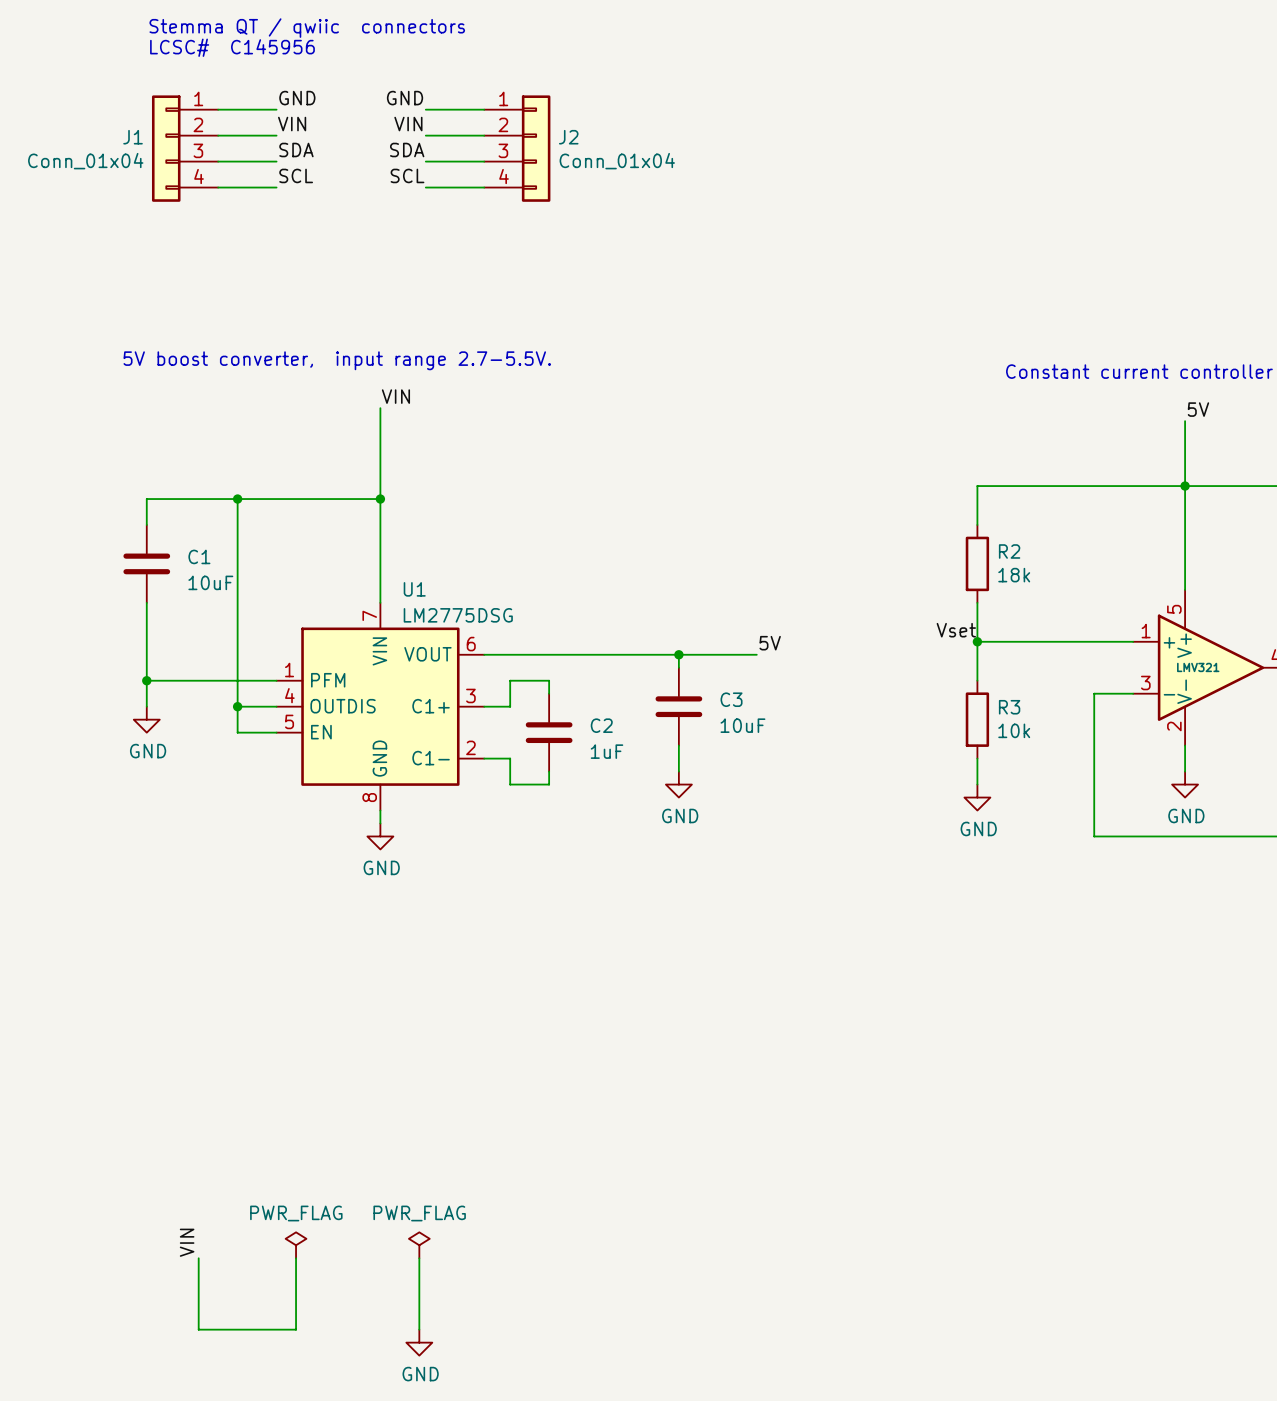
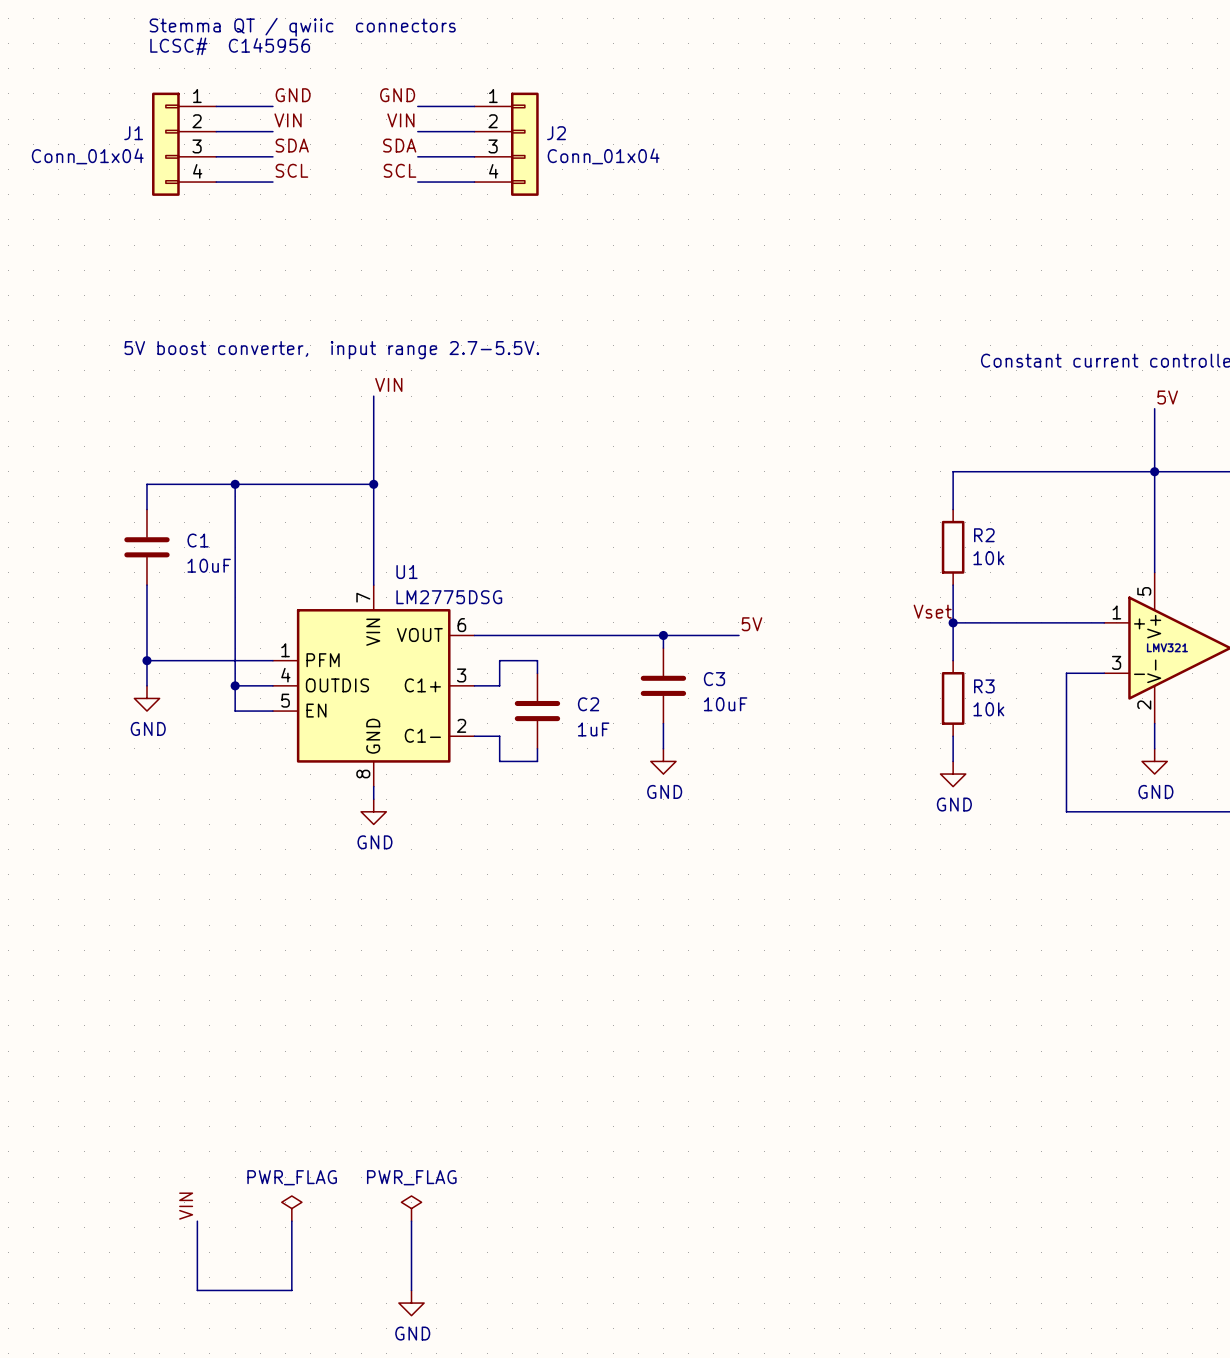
R2 value: 18k (1014, 575) -> 10k (988, 558)

